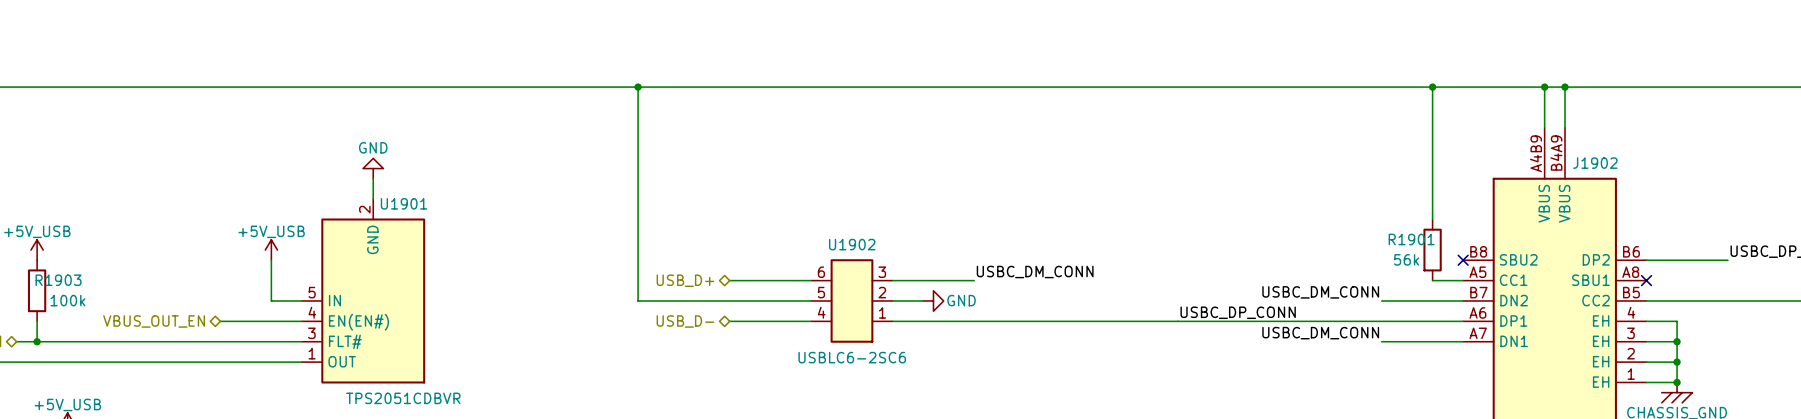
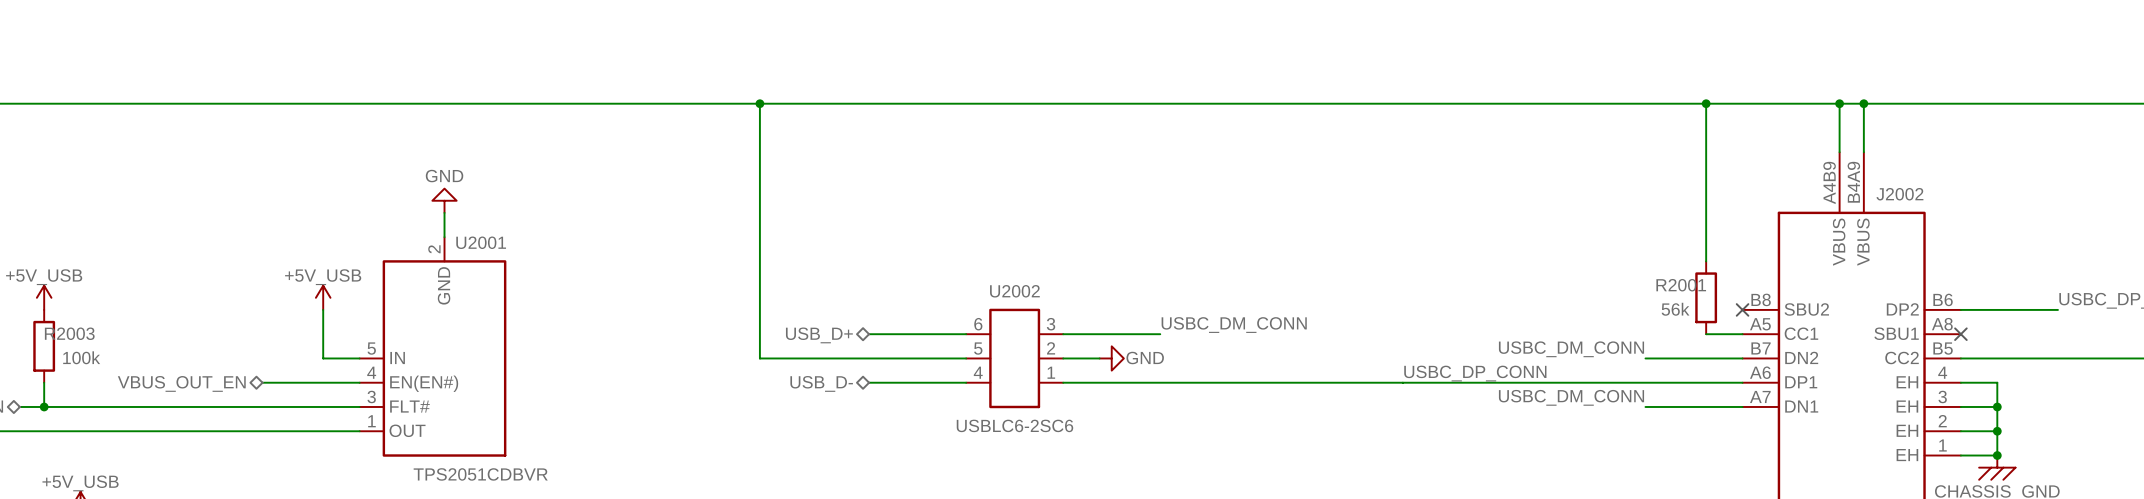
J1902 name: J1902 (1595, 163) -> J2002 (1899, 194)
U1901 name: U1901 (404, 203) -> U2001 (481, 242)
R1901 name: R1901 (1411, 239) -> R2001 (1681, 285)
U1902 name: U1902 (852, 244) -> U2002 (1014, 291)
R1903 name: R1903 (58, 280) -> R2003 (69, 333)

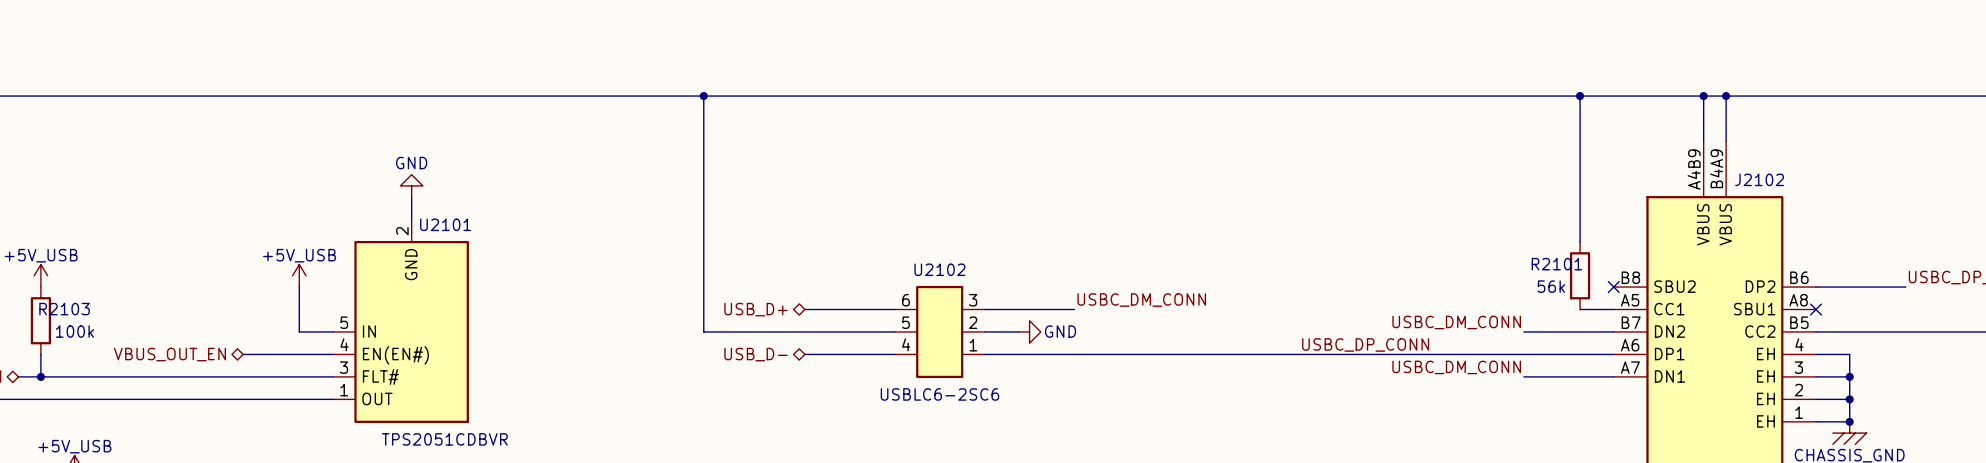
J2002 name: J2002 (1899, 194) -> J2102 (1759, 179)
U2001 name: U2001 (481, 242) -> U2101 (445, 224)
R2001 name: R2001 (1681, 285) -> R2101 (1556, 264)
U2002 name: U2002 (1014, 291) -> U2102 (939, 269)
R2003 name: R2003 (69, 333) -> R2103 (64, 309)

